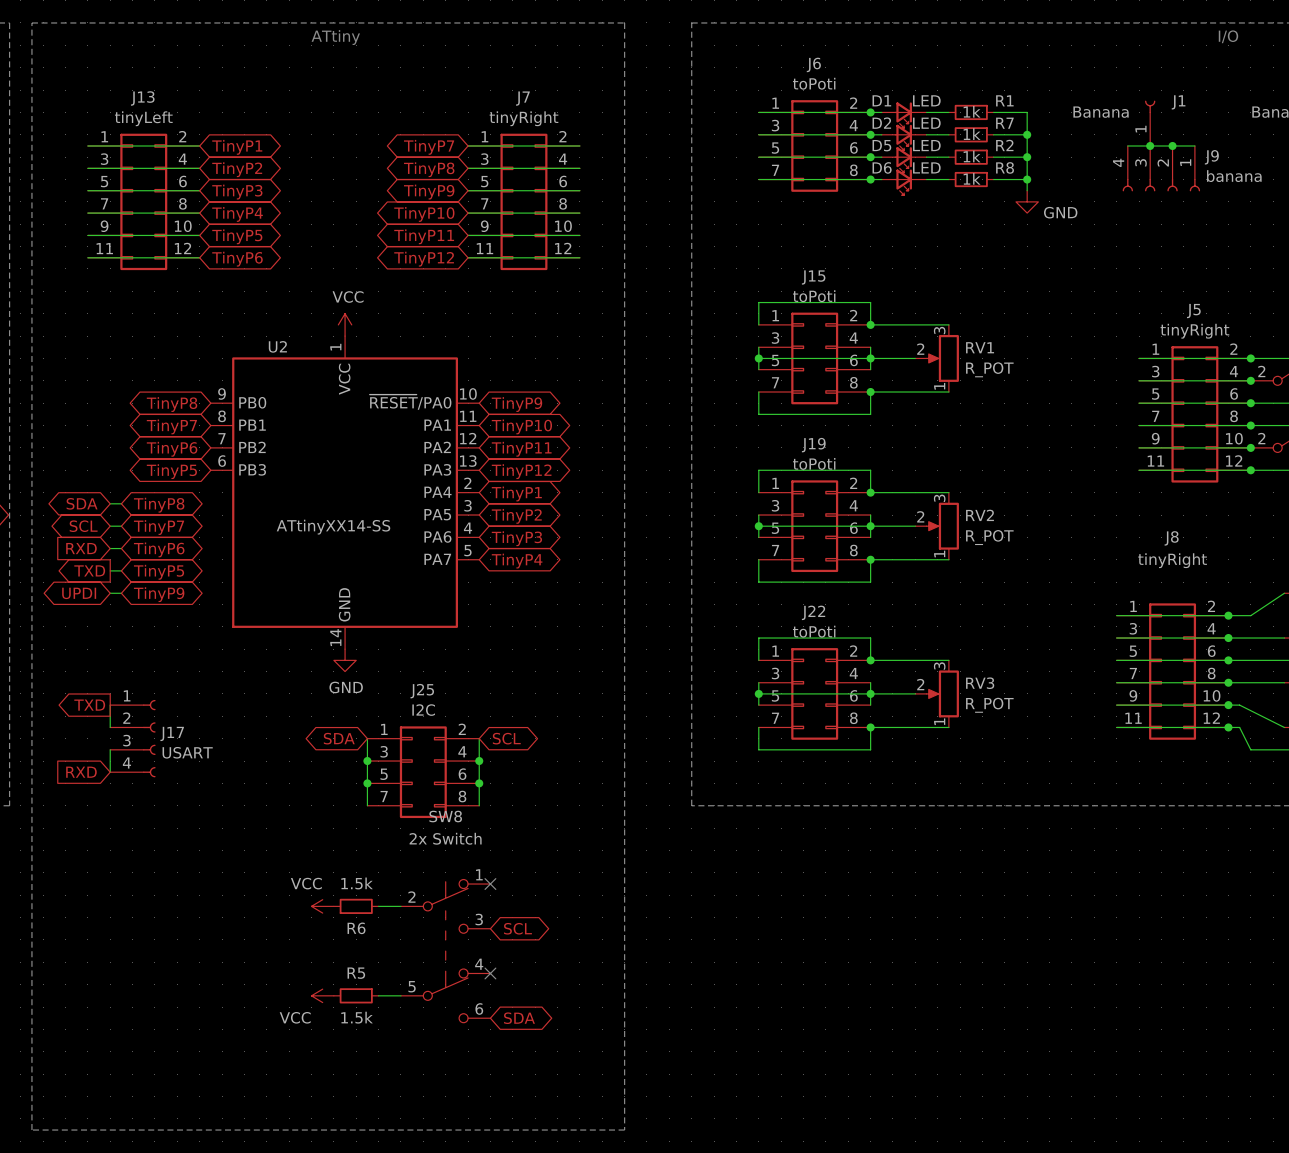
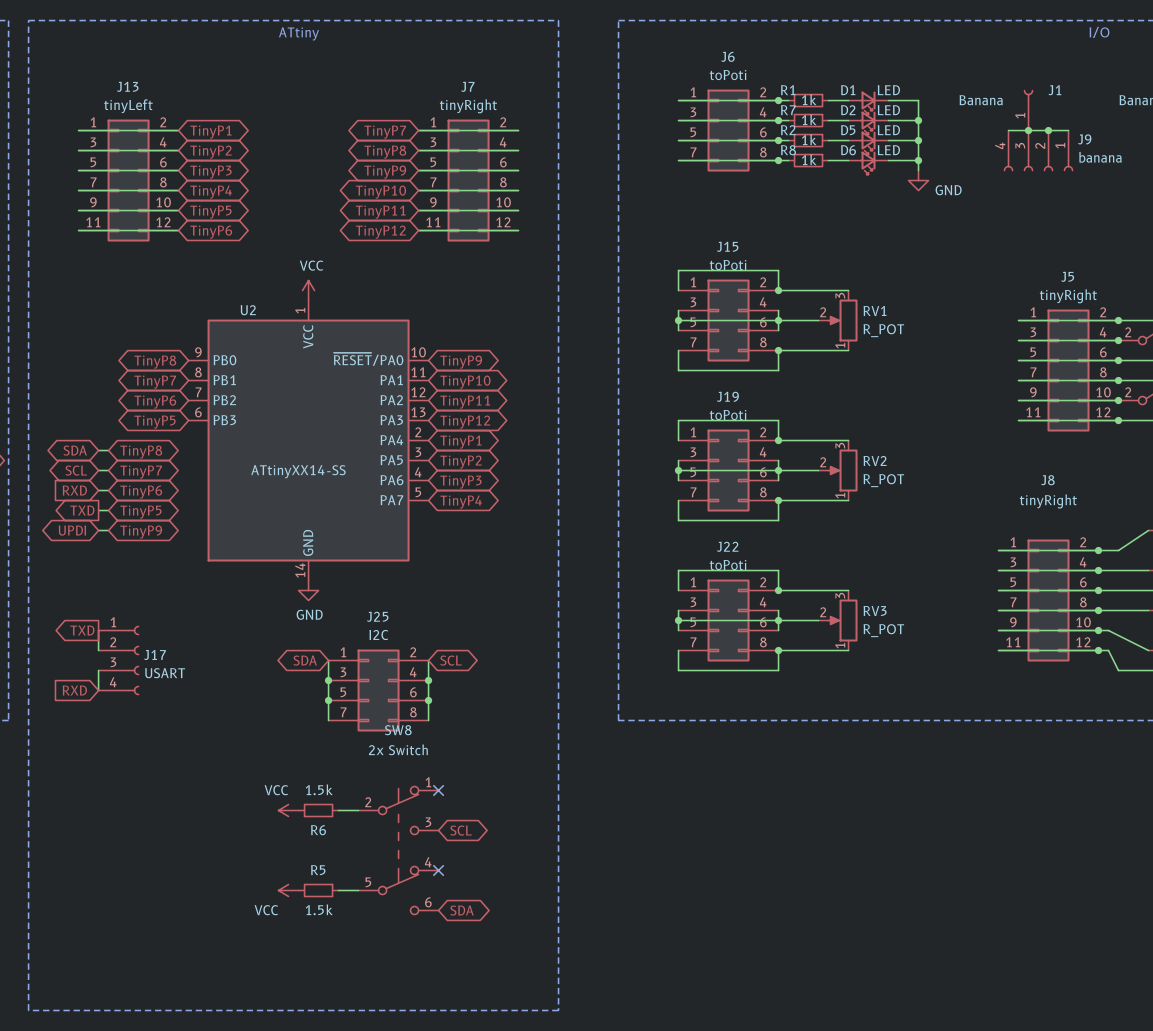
R1 name position: R1 (1004, 100) -> R1 (788, 90)
R1 position: (971, 112) -> (808, 100)
D1 position: (904, 115) -> (868, 103)
R7 name position: R7 (1004, 123) -> R7 (788, 110)
R7 position: (971, 134) -> (808, 120)
D2 position: (904, 137) -> (868, 123)
R2 name position: R2 (1004, 145) -> R2 (788, 130)
R2 position: (971, 157) -> (808, 140)
D5 position: (904, 159) -> (868, 143)
R8 name position: R8 (1005, 167) -> R8 (788, 150)
R8 position: (971, 179) -> (808, 160)
D6 position: (904, 182) -> (868, 163)

